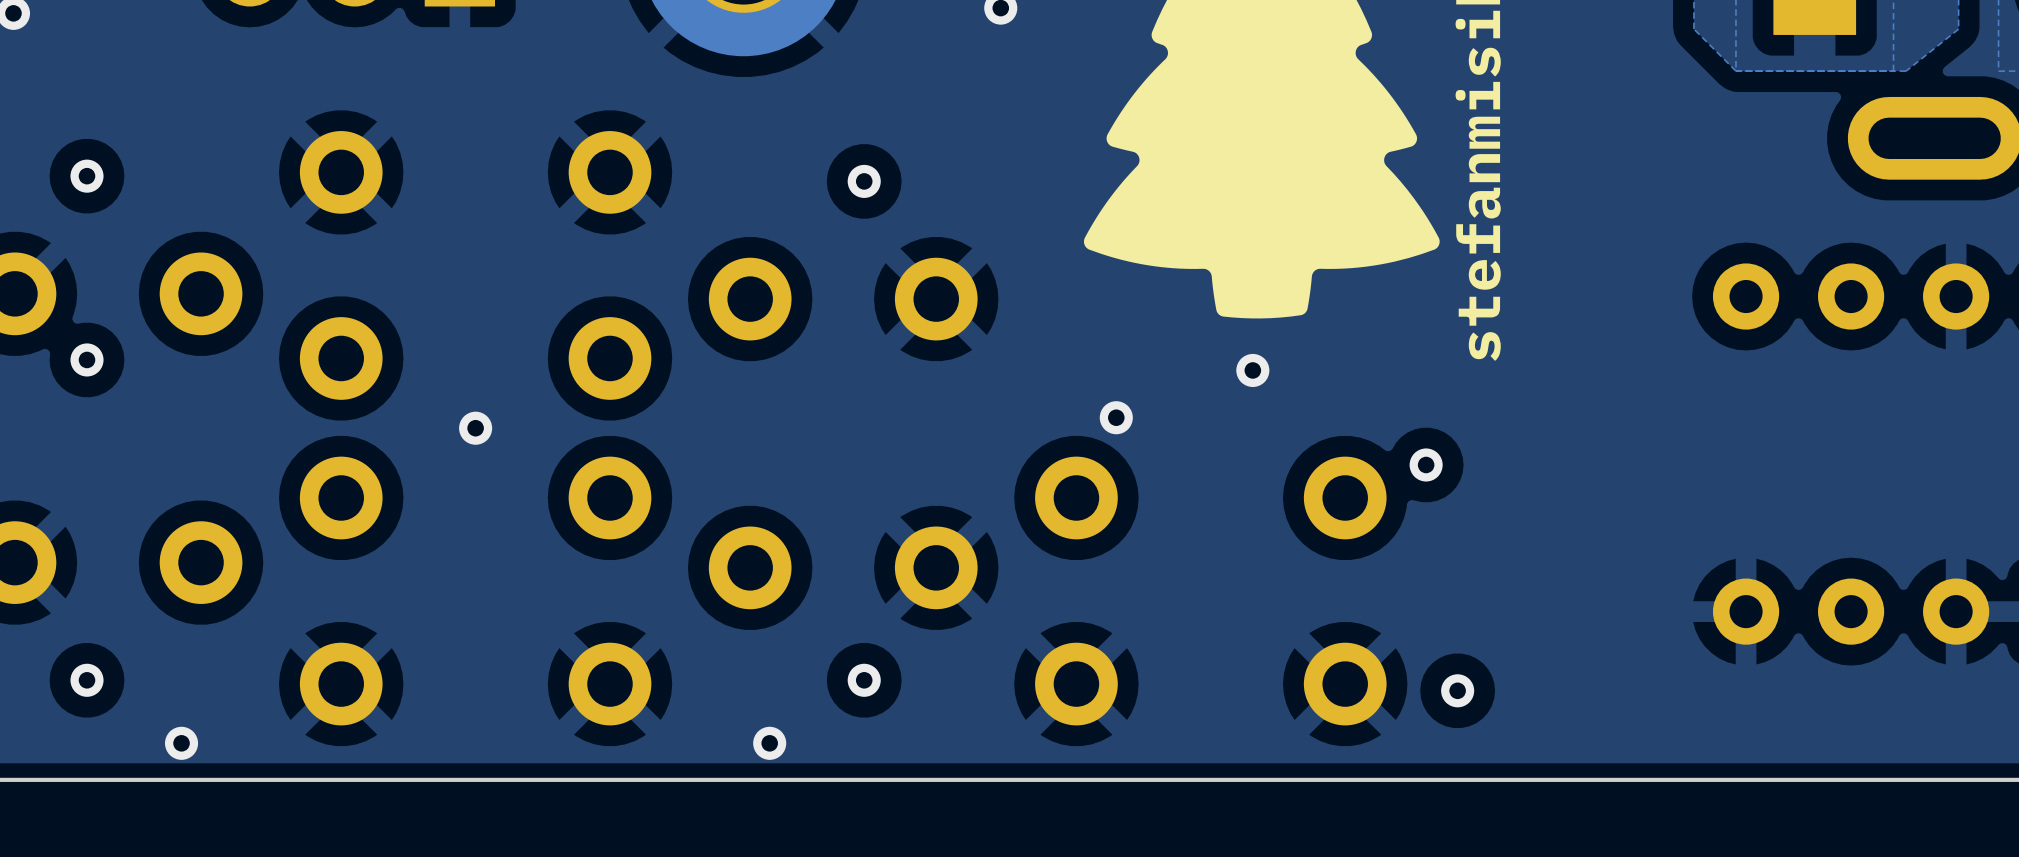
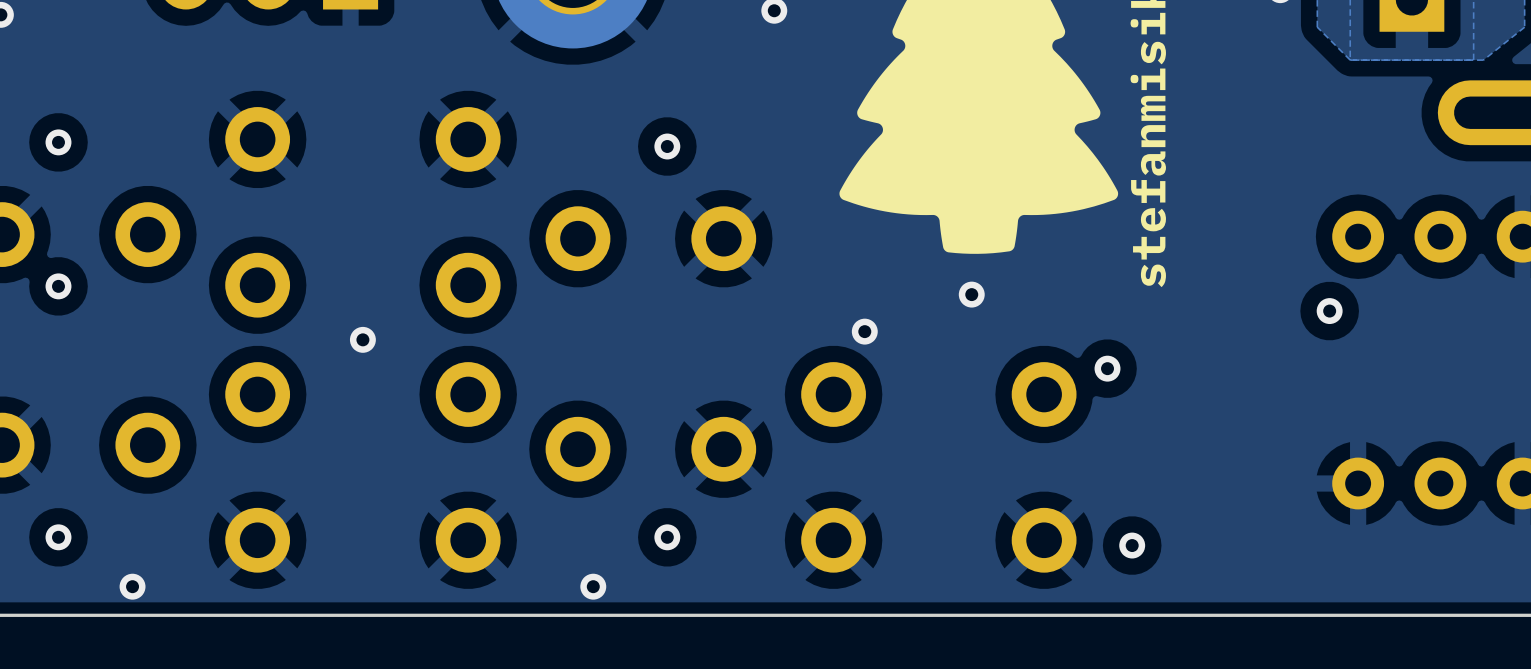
via: none -> (1329, 311)

